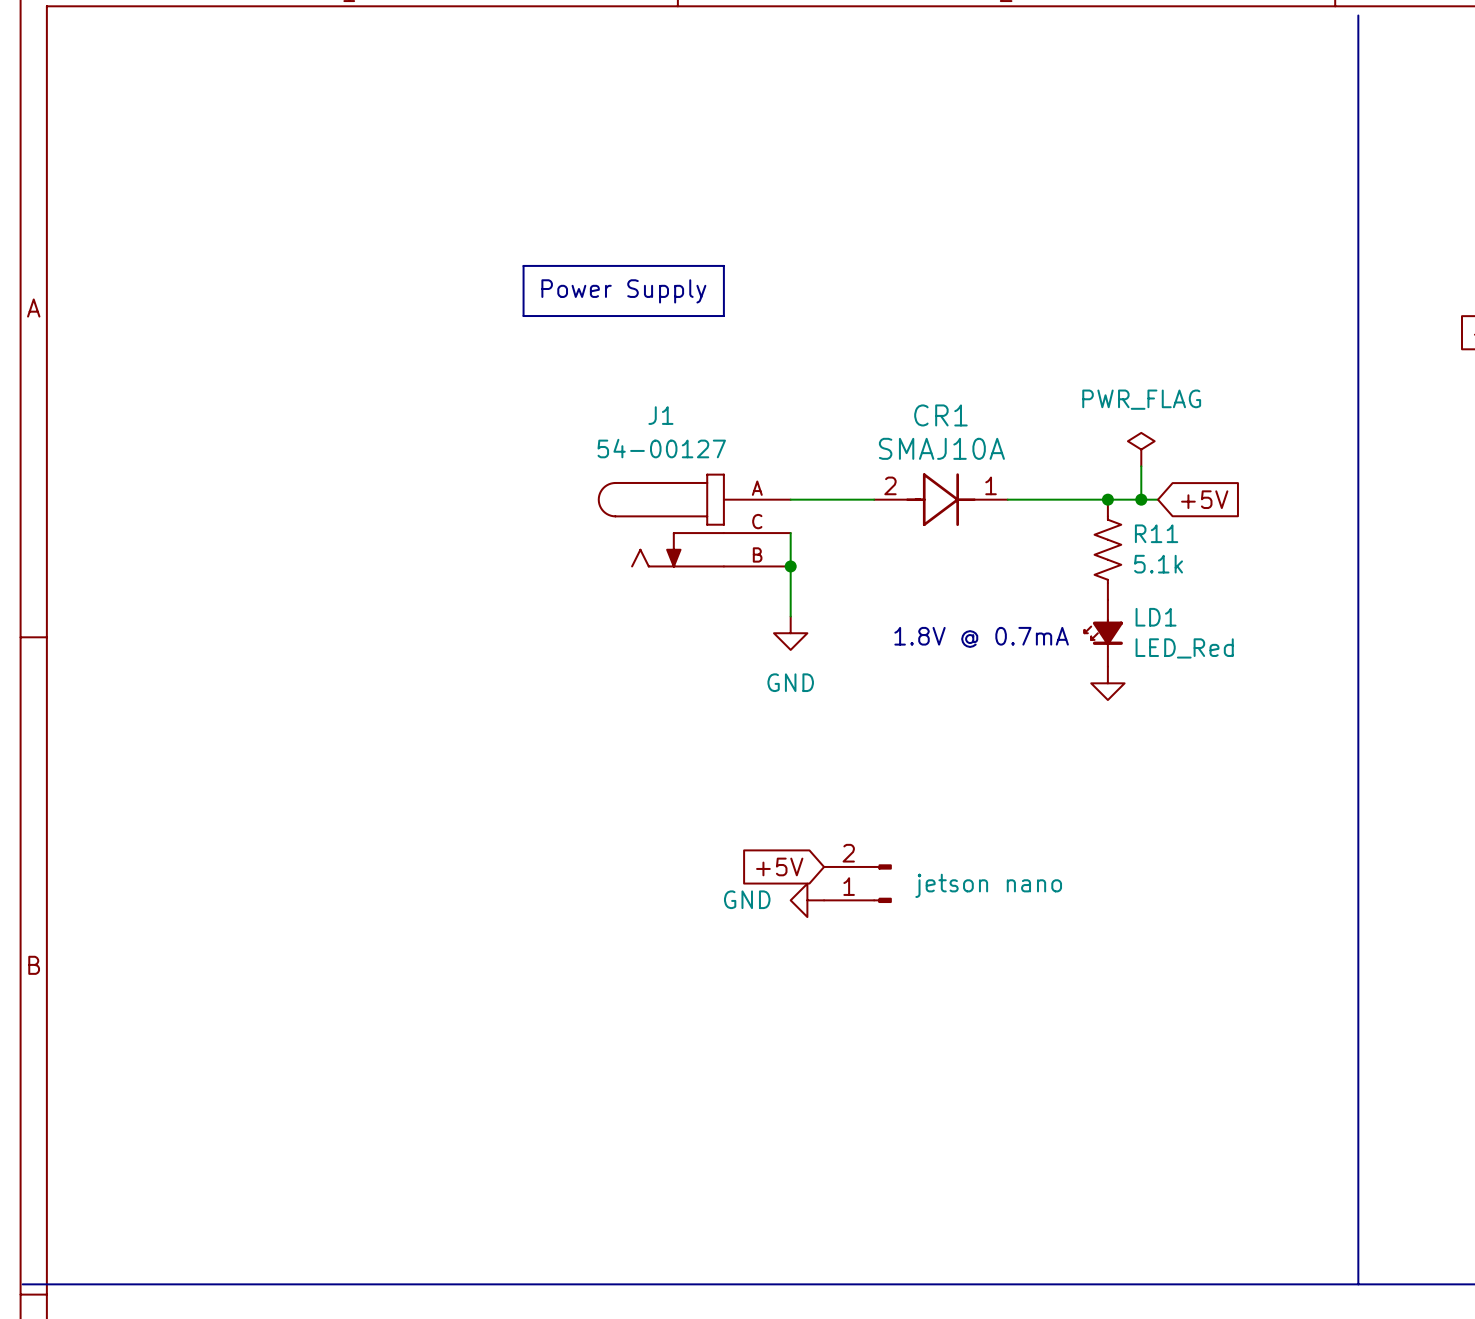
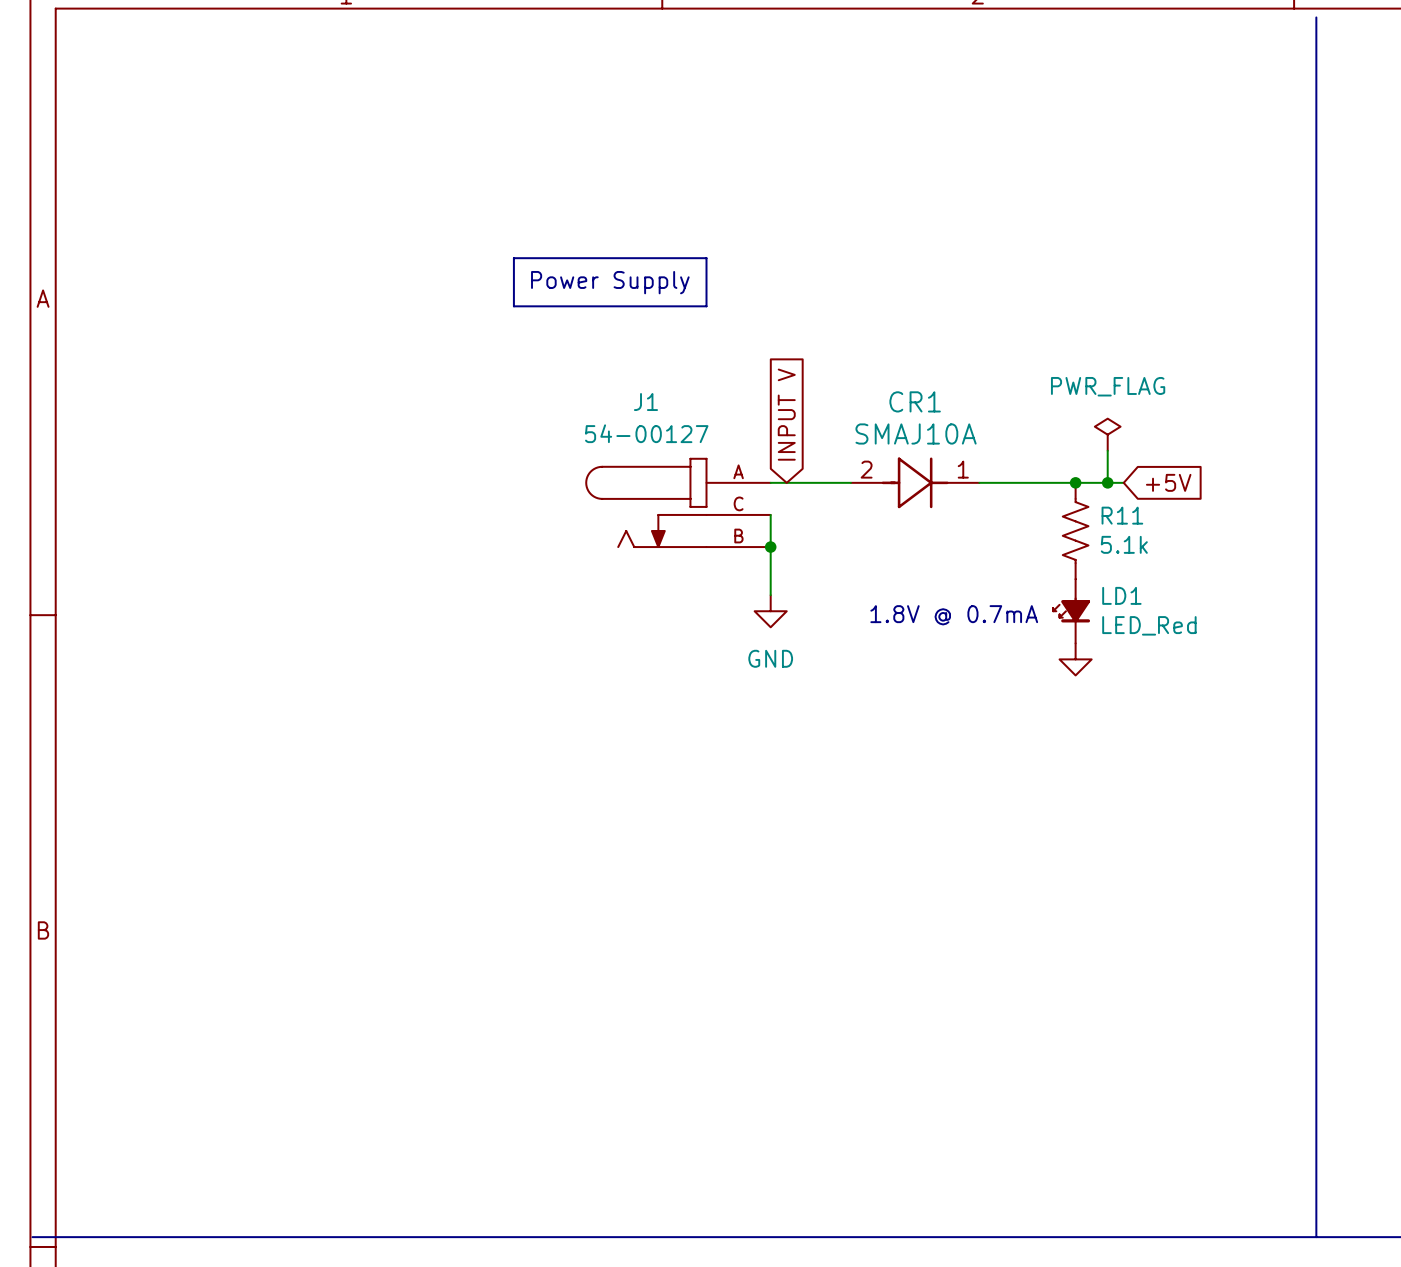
global label: none -> INPUT V (786, 414)
global label: +5V (779, 866) -> none
part: jetson nano (857, 883) -> none
power symbol: GND (807, 900) -> none

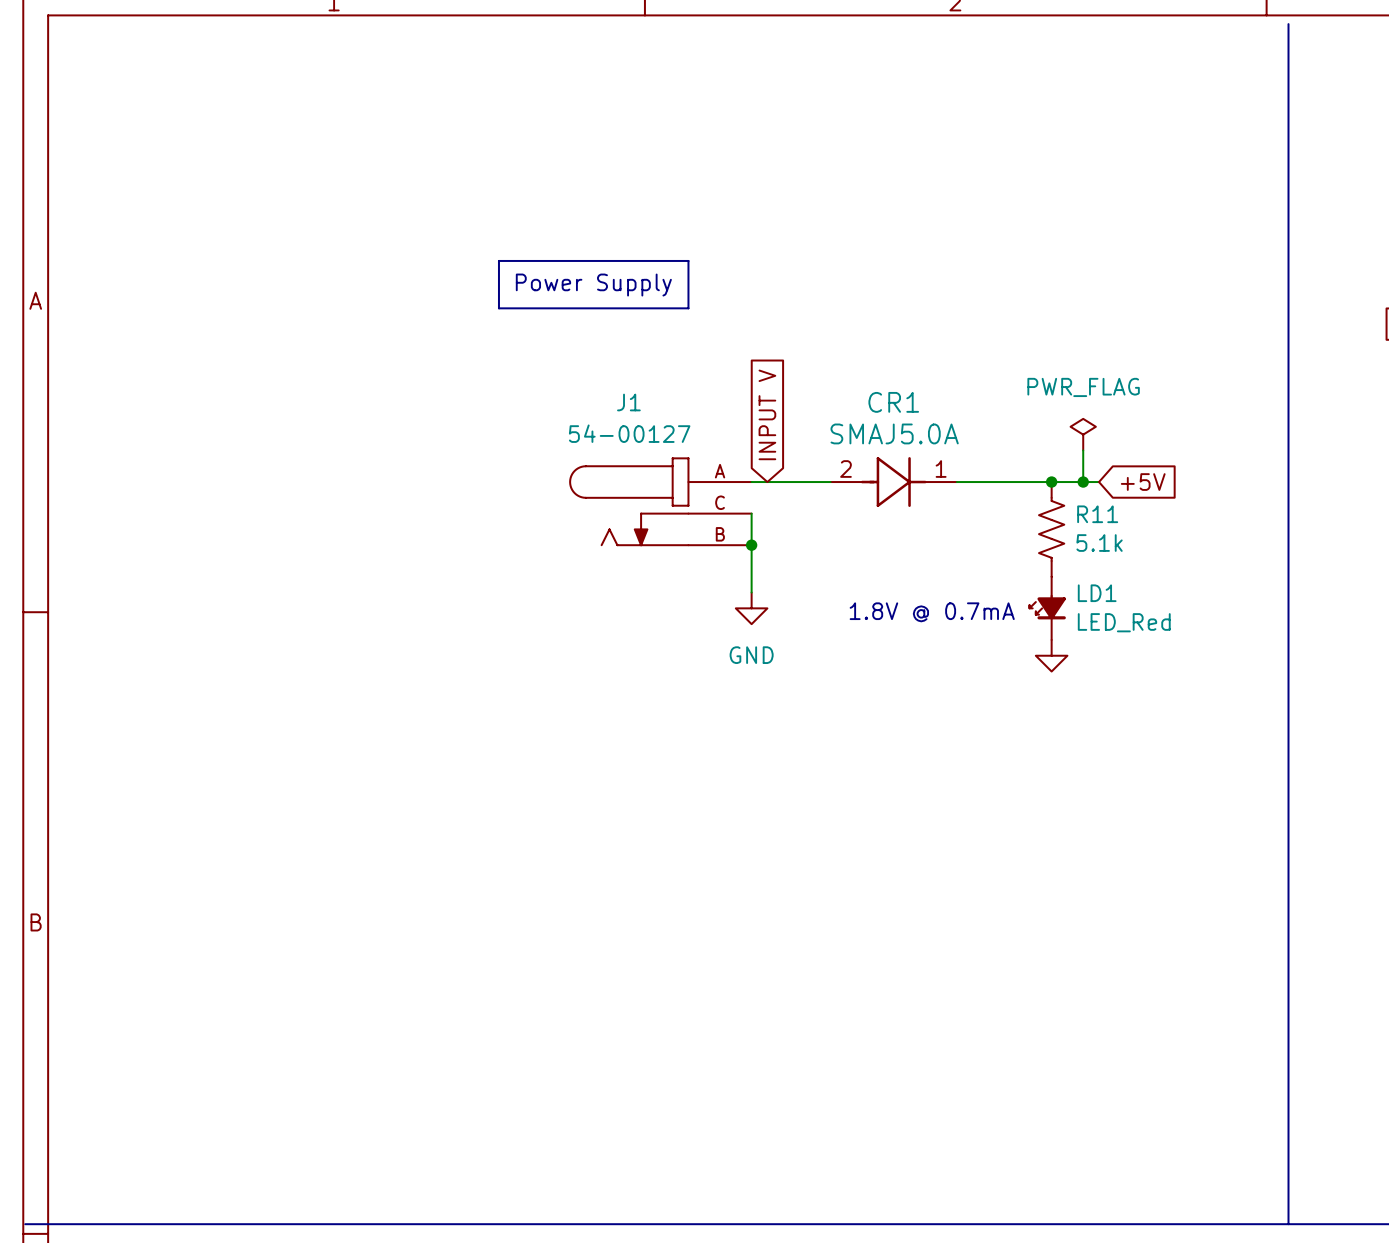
CR1 value: SMAJ10A (916, 433) -> SMAJ5.0A (894, 433)

